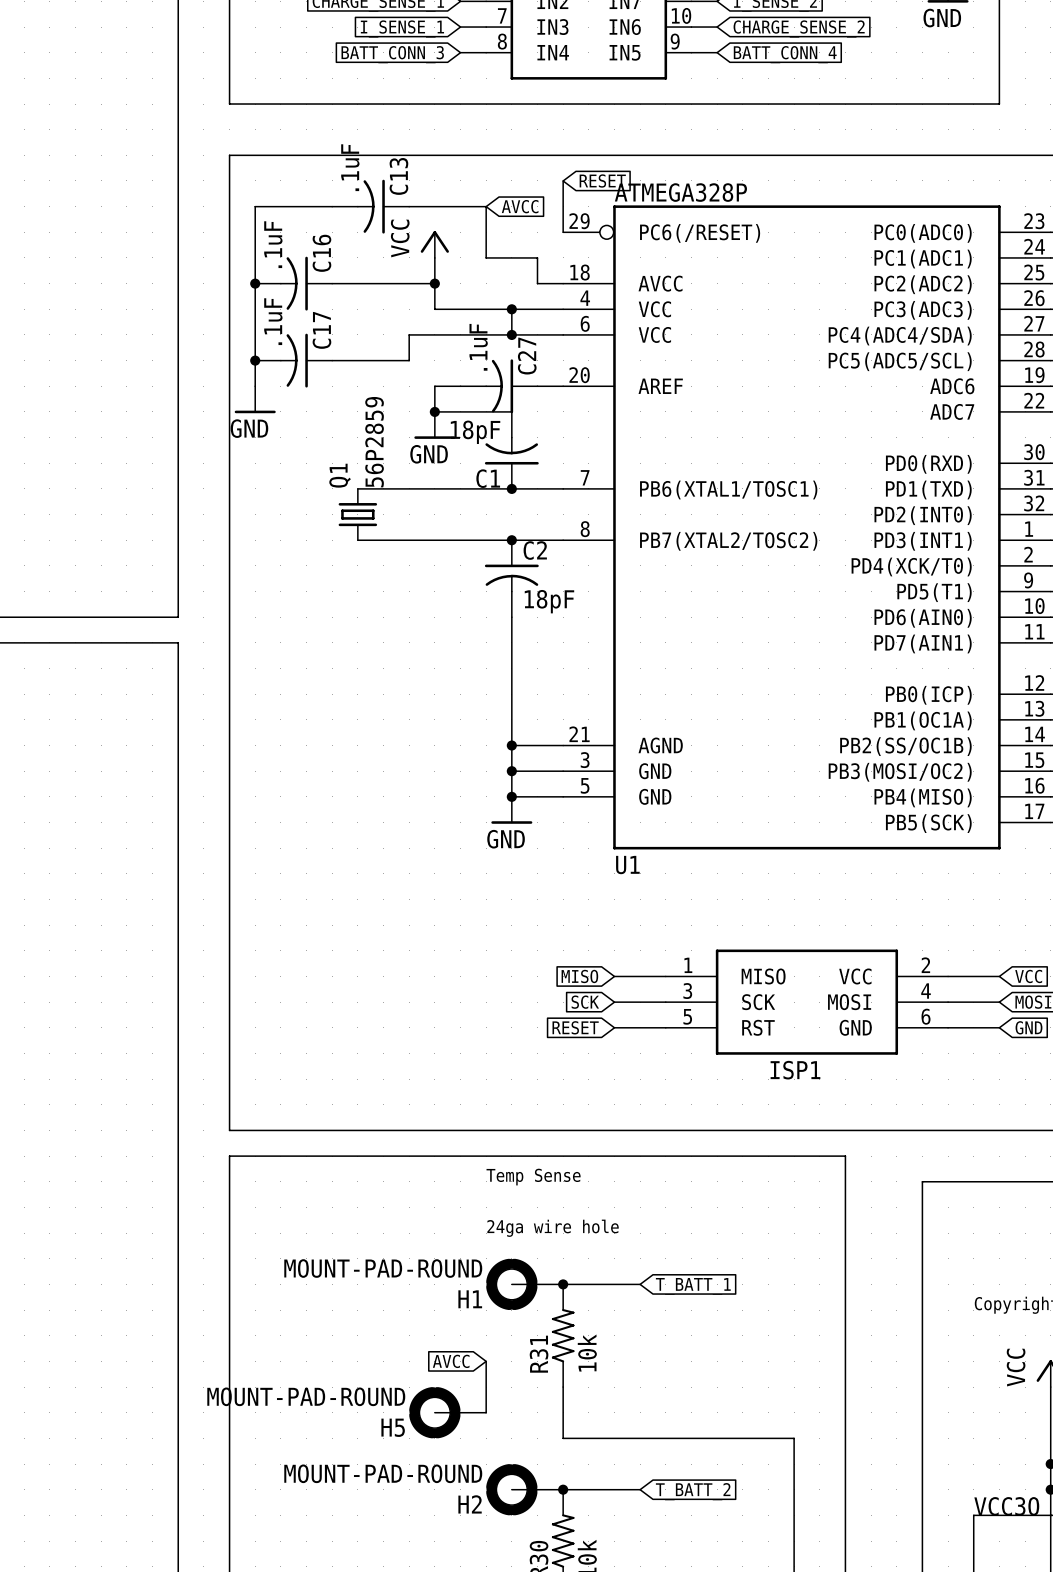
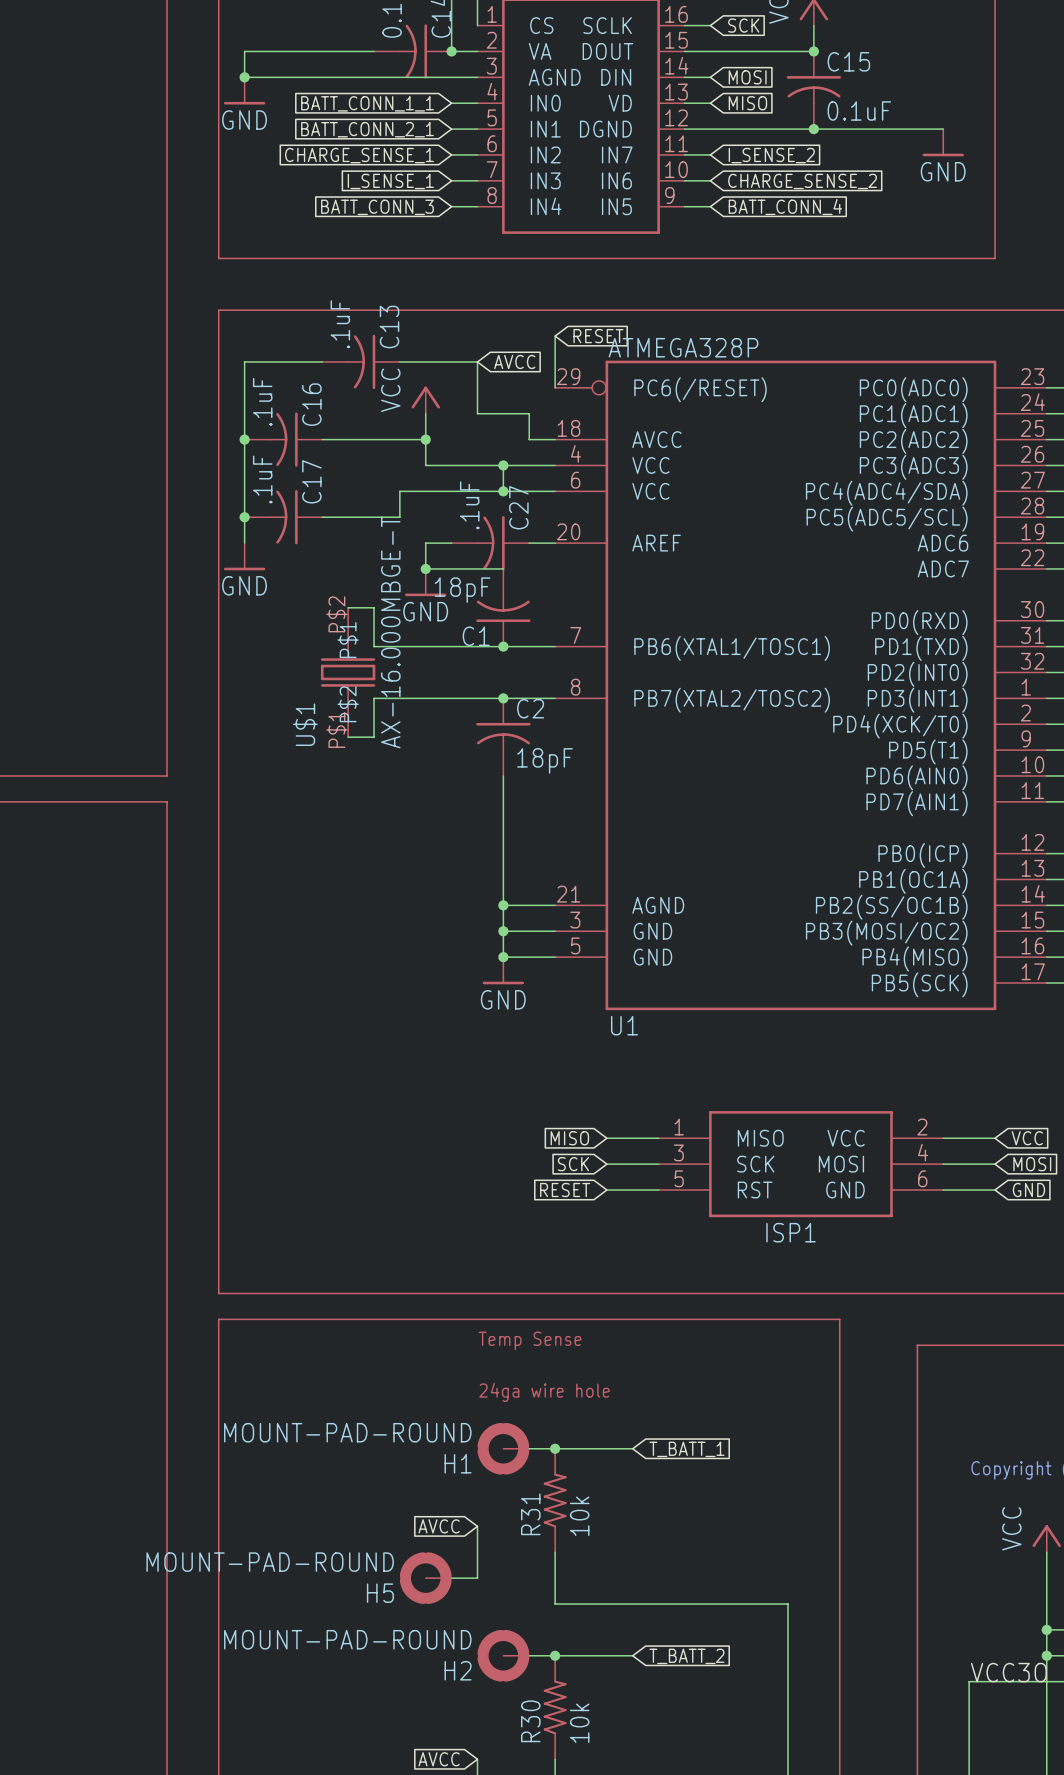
wire: (357, 488) (383, 488) -> (348, 607) (373, 607) (373, 646)
Q1: 56P2859 (357, 514) -> none
U$1: none -> AX-16.000MBGE-T (348, 672)
wire: (357, 540) (383, 540) -> (348, 737) (373, 737) (373, 698)

